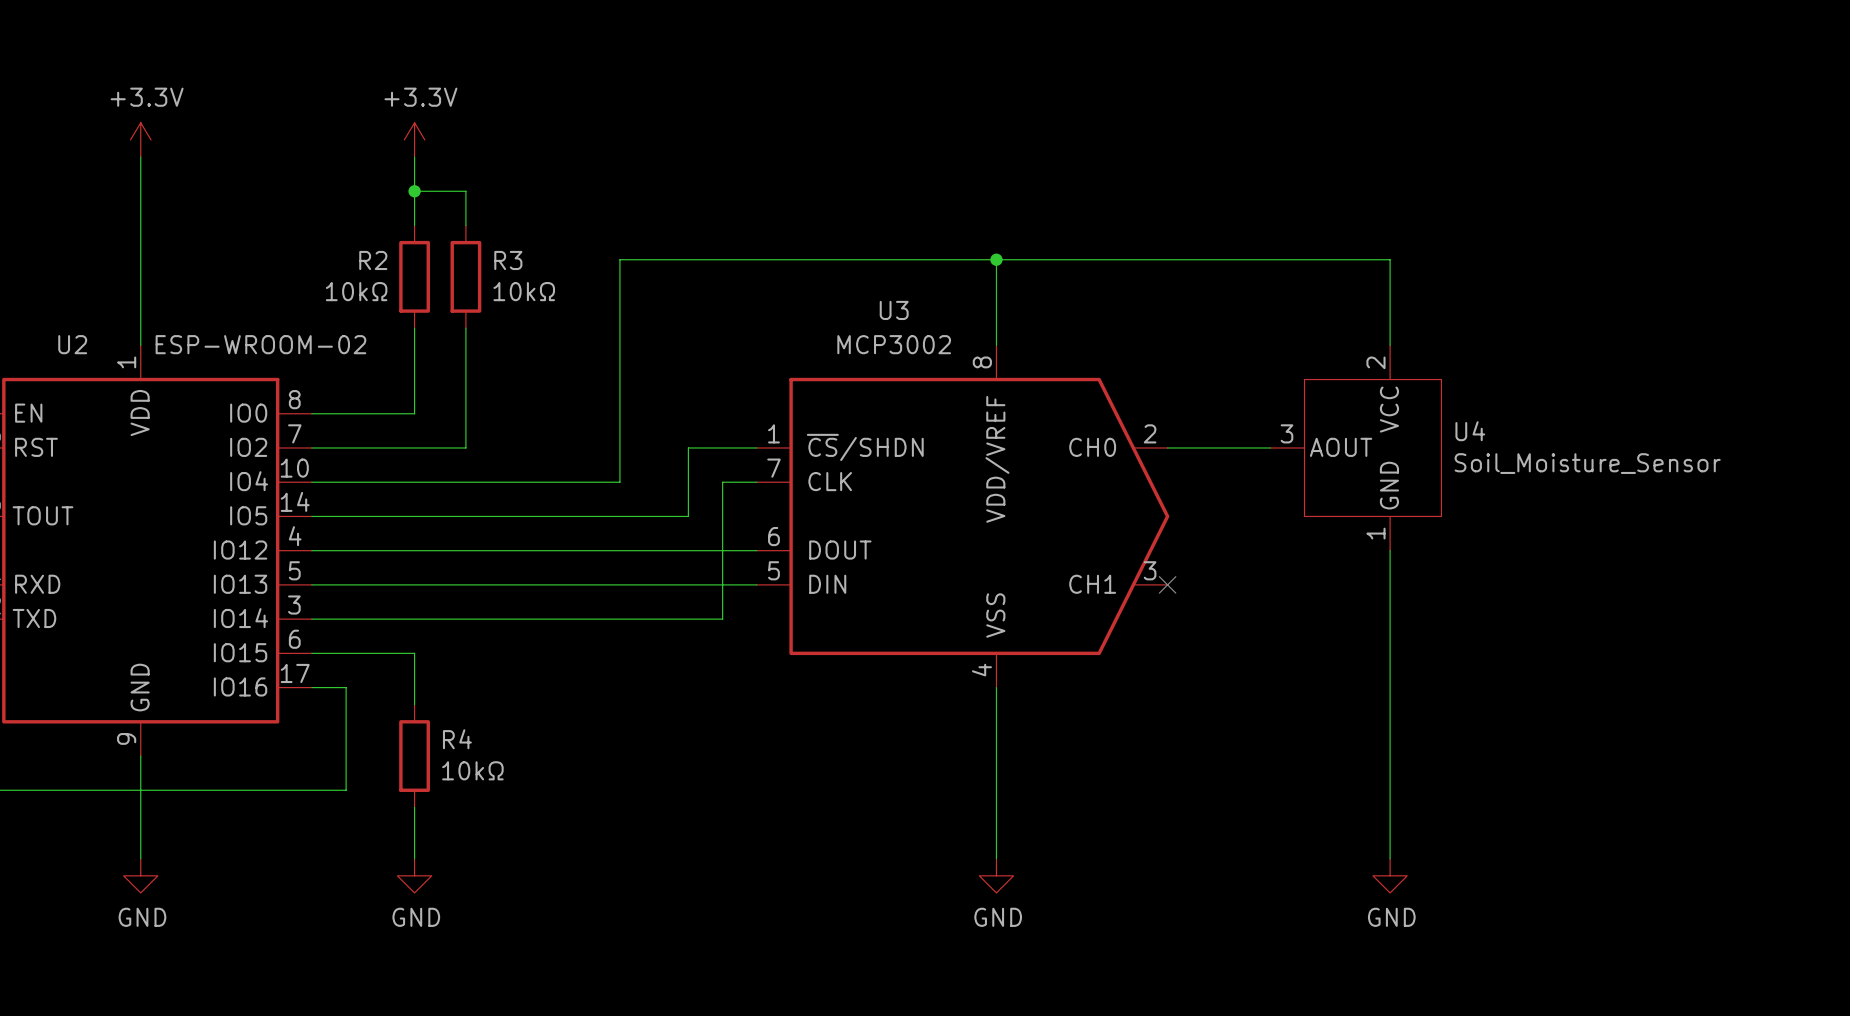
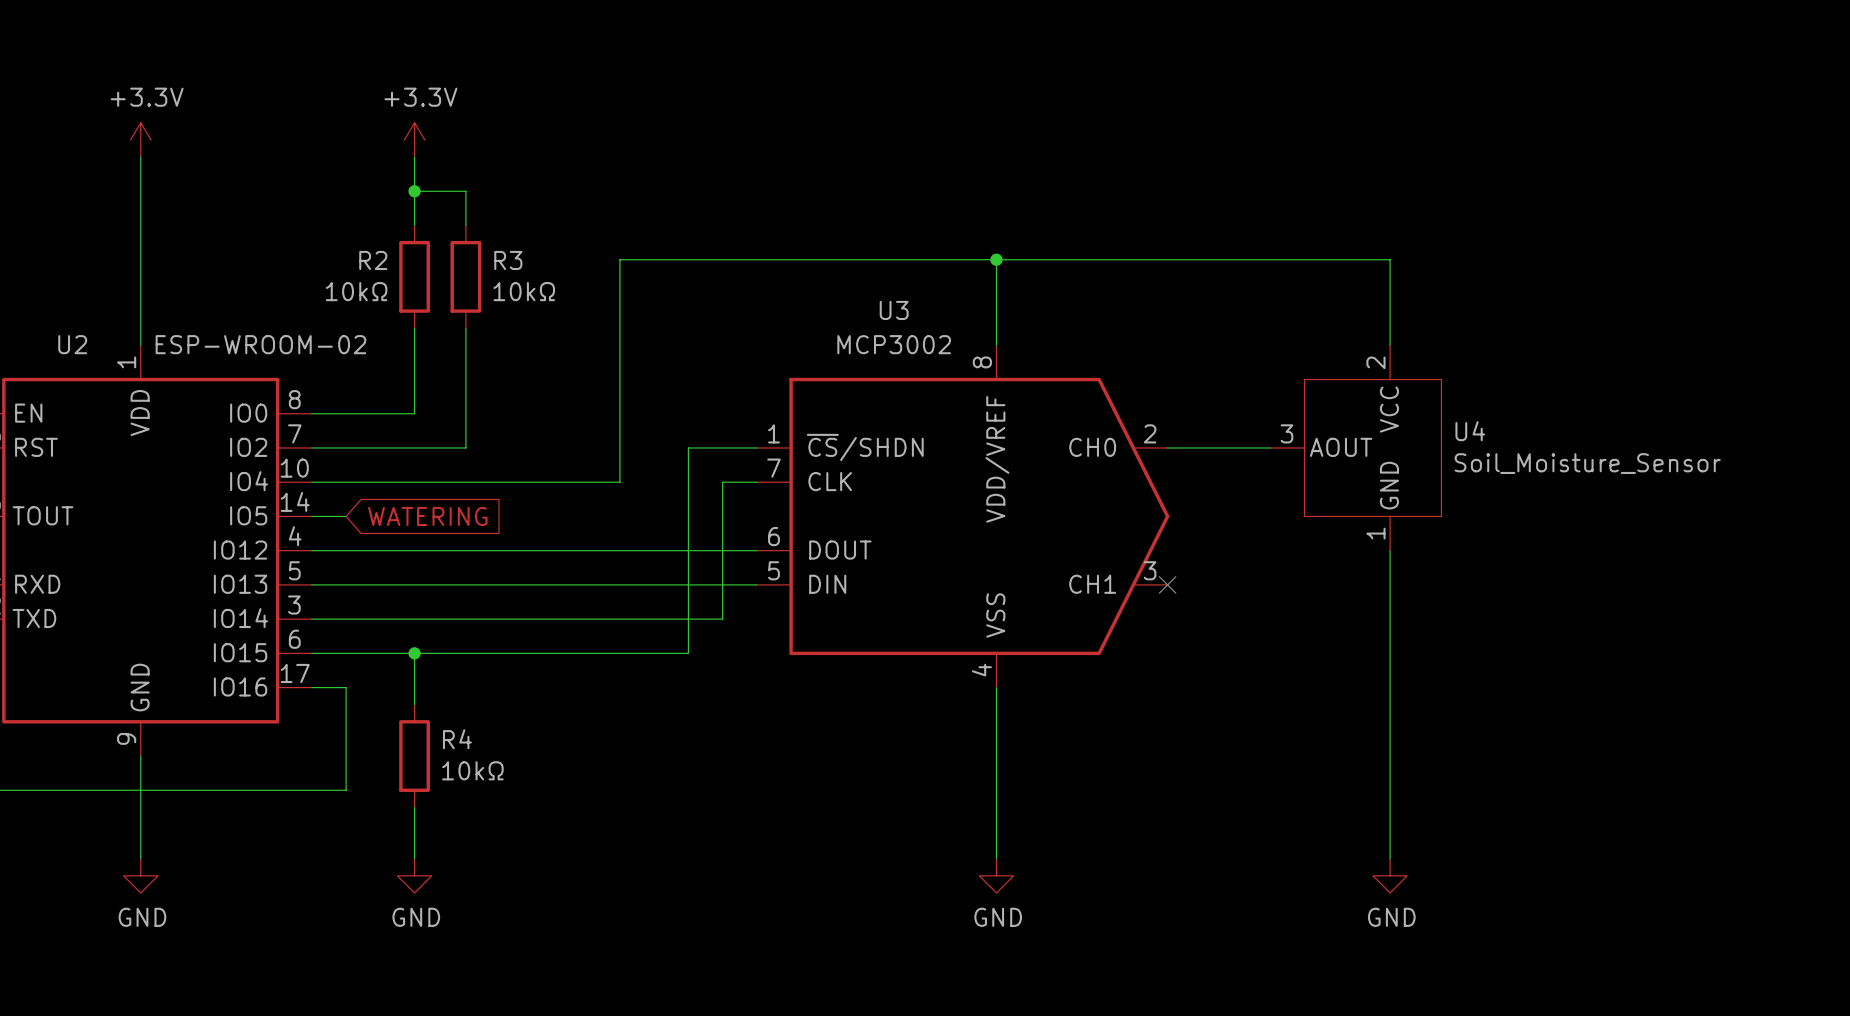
wire: (346, 516) (688, 516) -> (414, 653) (688, 653) (688, 516)
global label: none -> WATERING (427, 516)
junction: none -> (414, 653)

